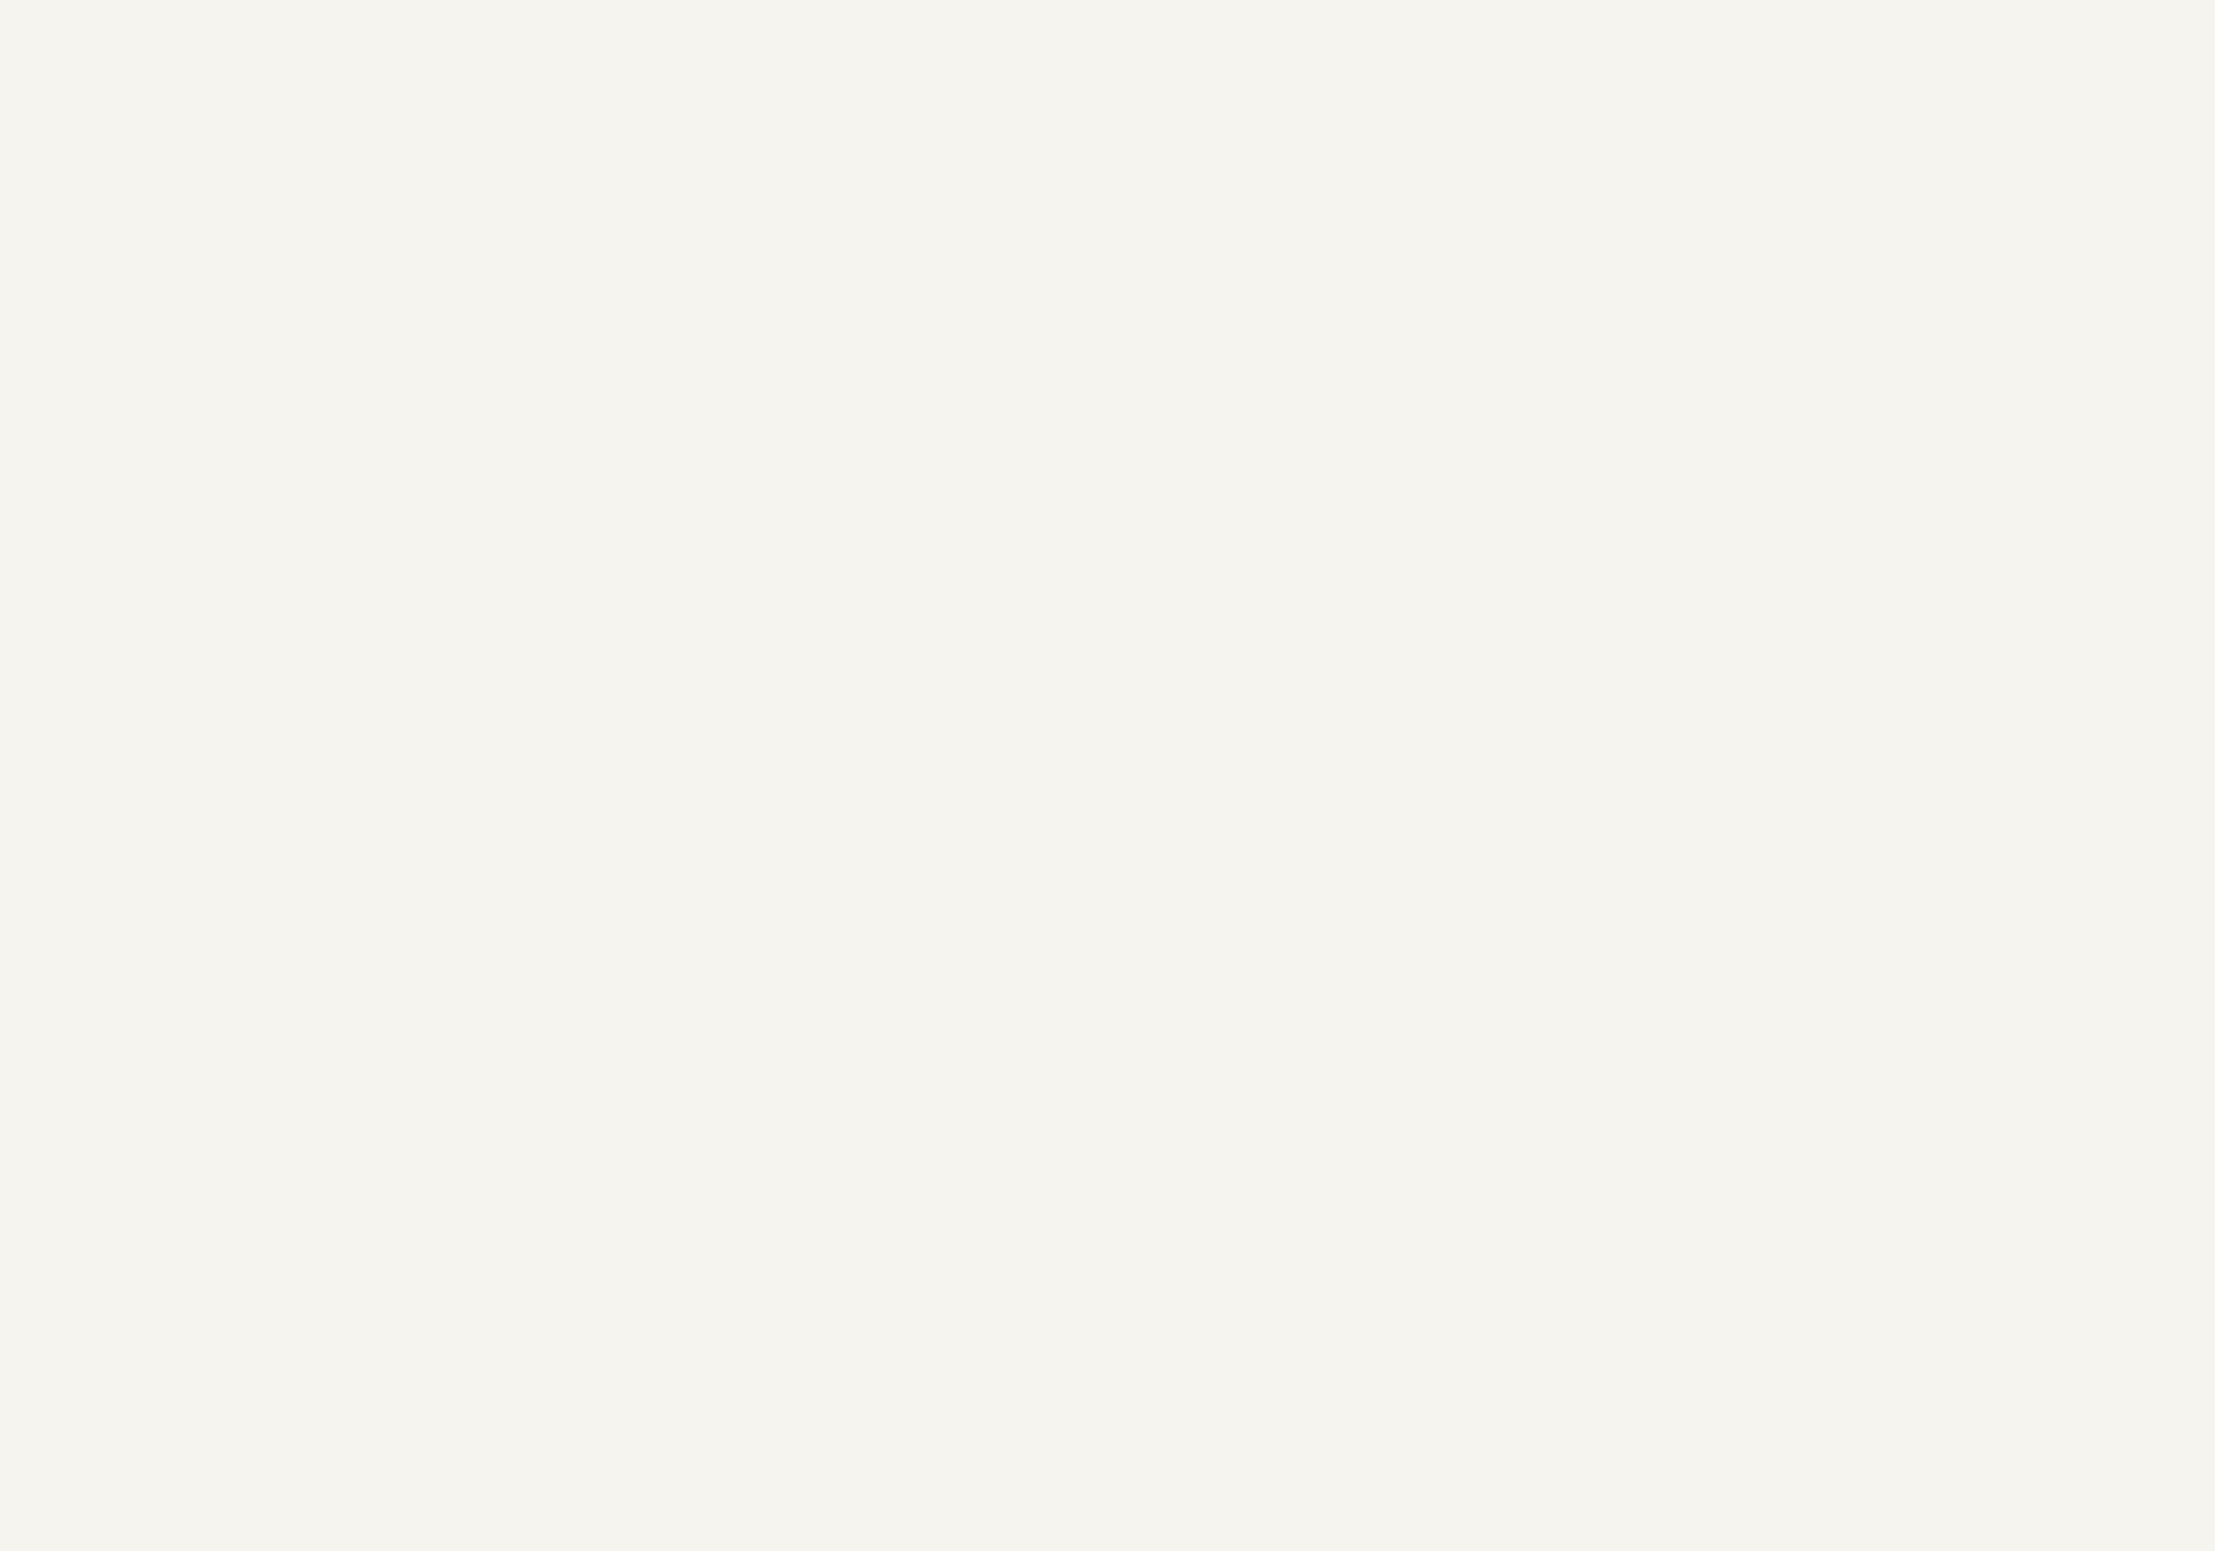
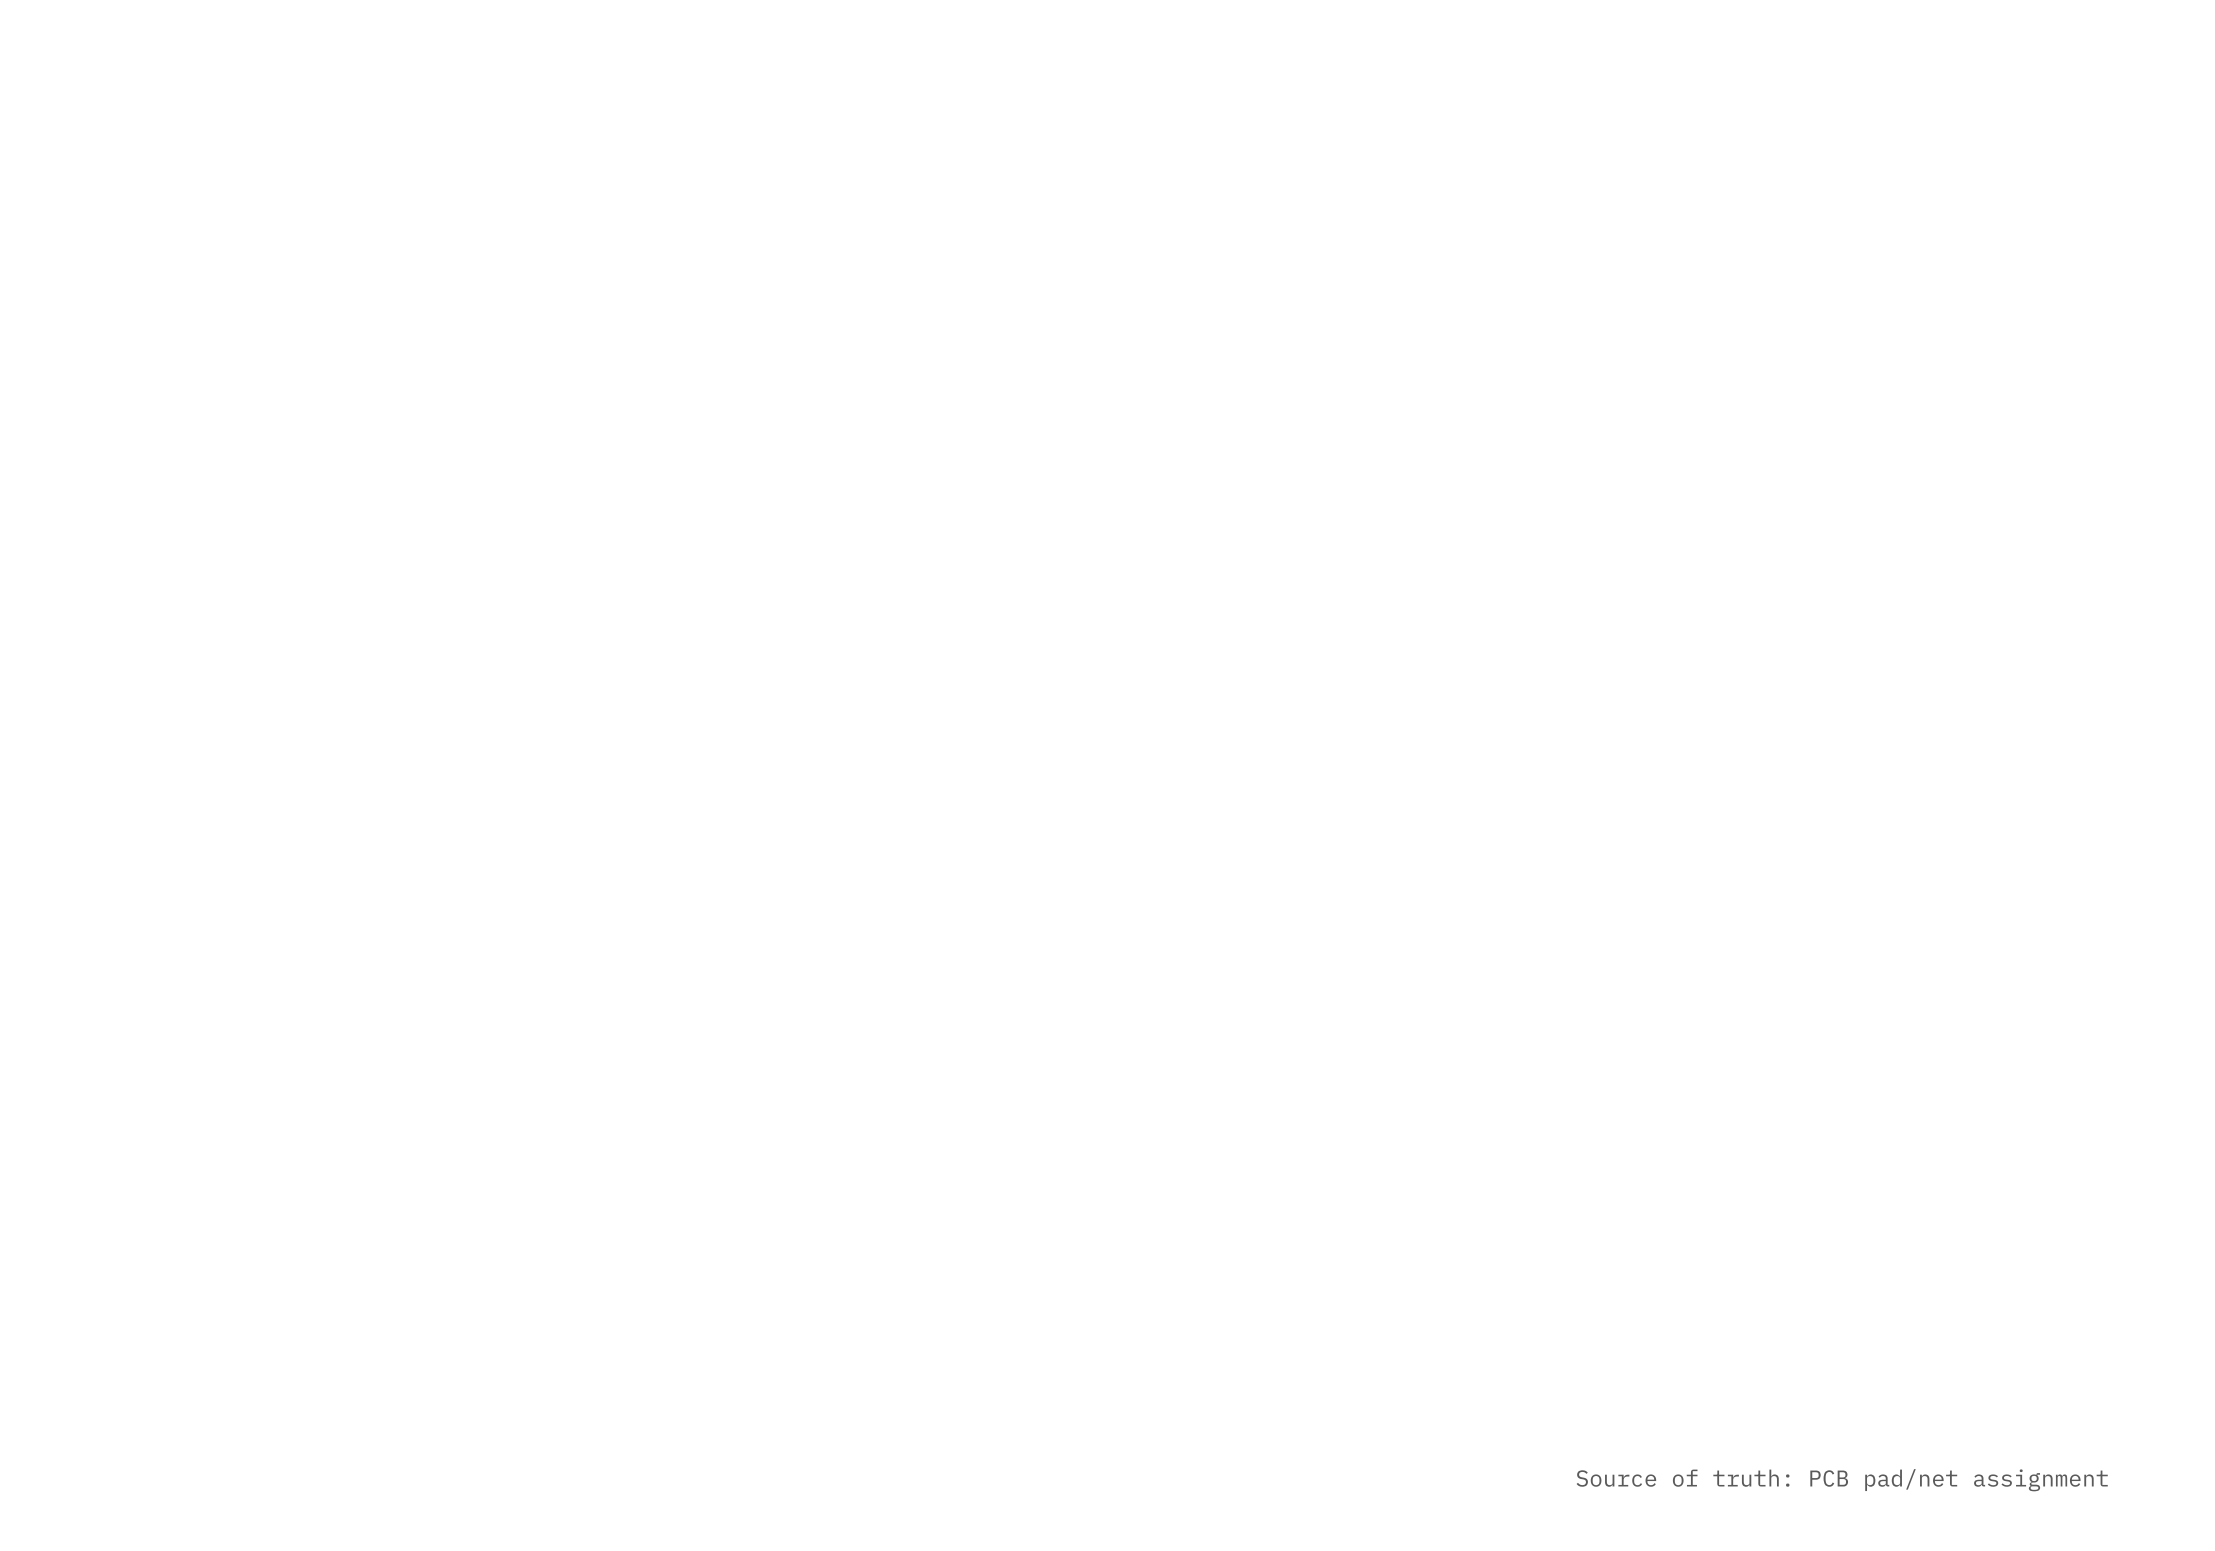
text: none -> Source of truth: PCB pad/net assignment (1842, 1480)

